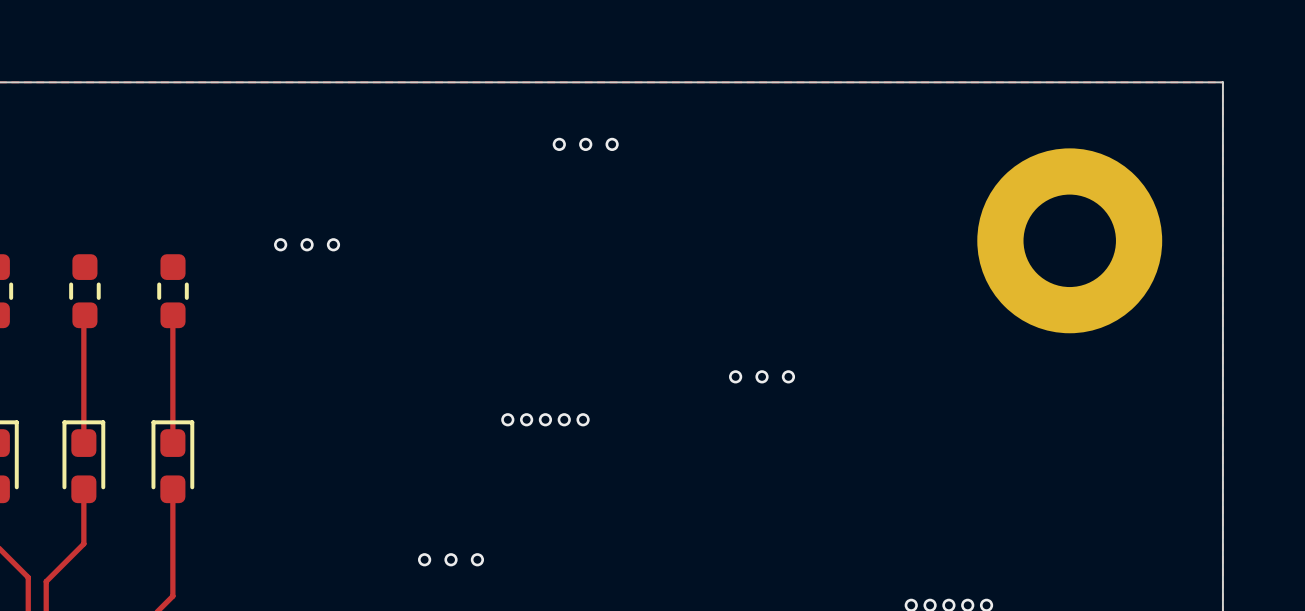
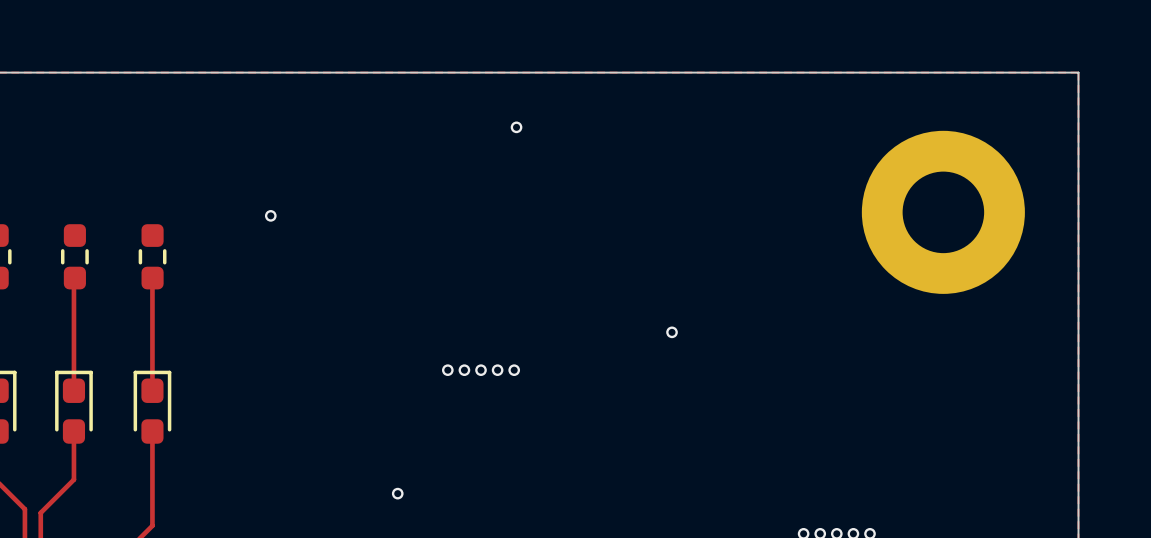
via: (559, 144) -> none
via: (612, 144) -> none
via: (280, 244) -> none
via: (333, 244) -> none
via: (735, 376) -> none
via: (788, 376) -> none
via: (424, 559) -> none
via: (477, 559) -> none

